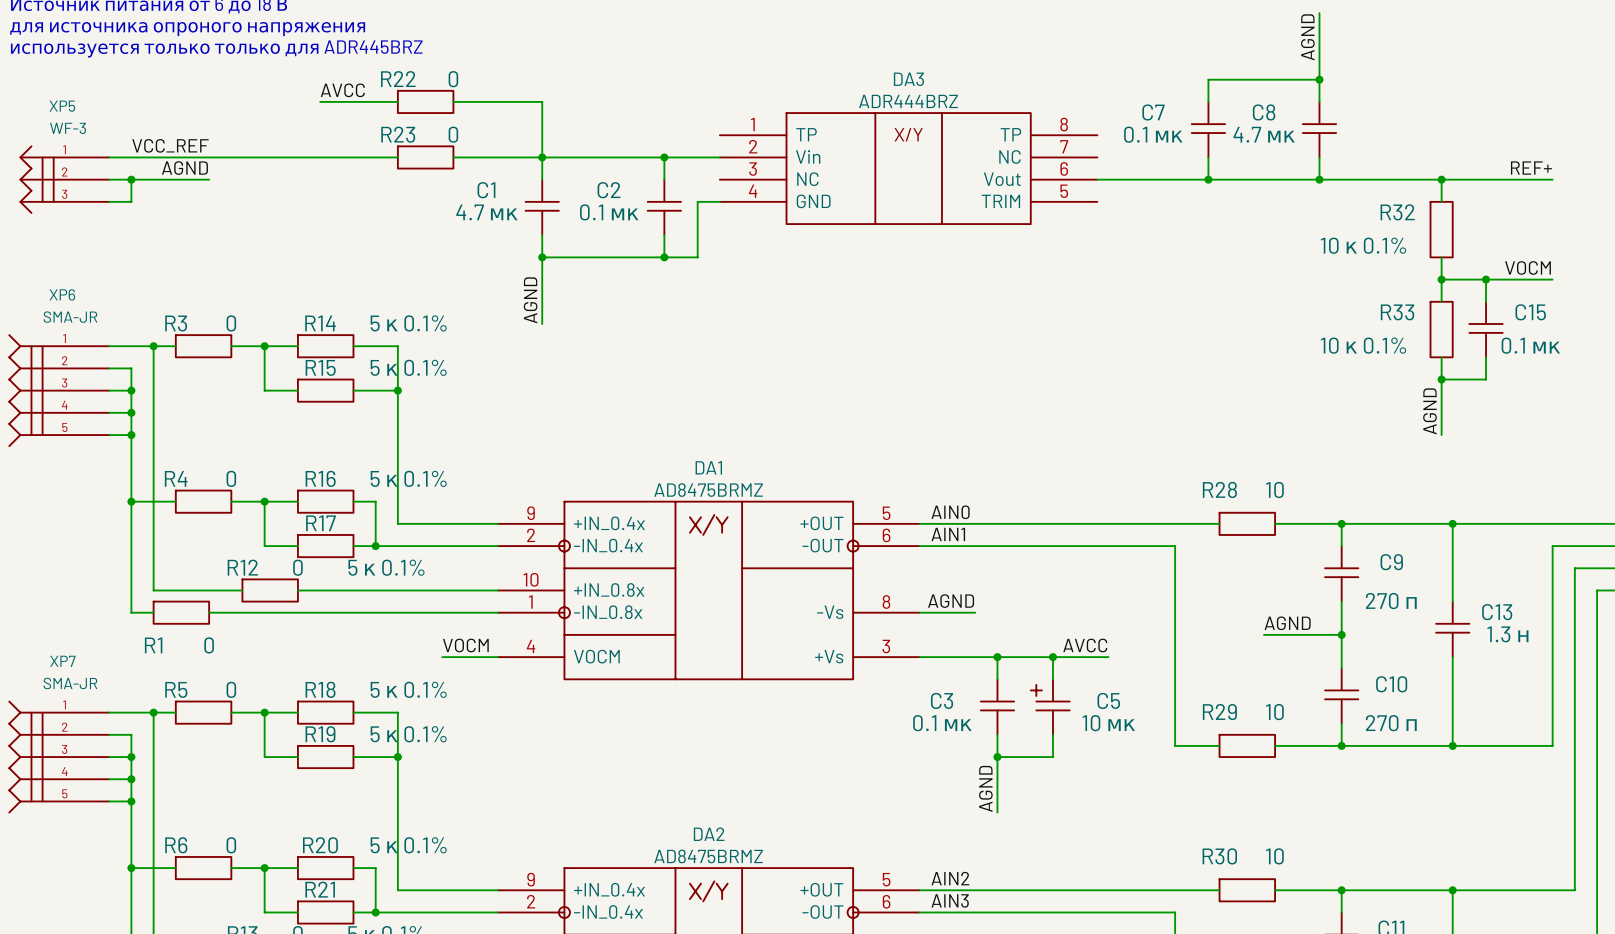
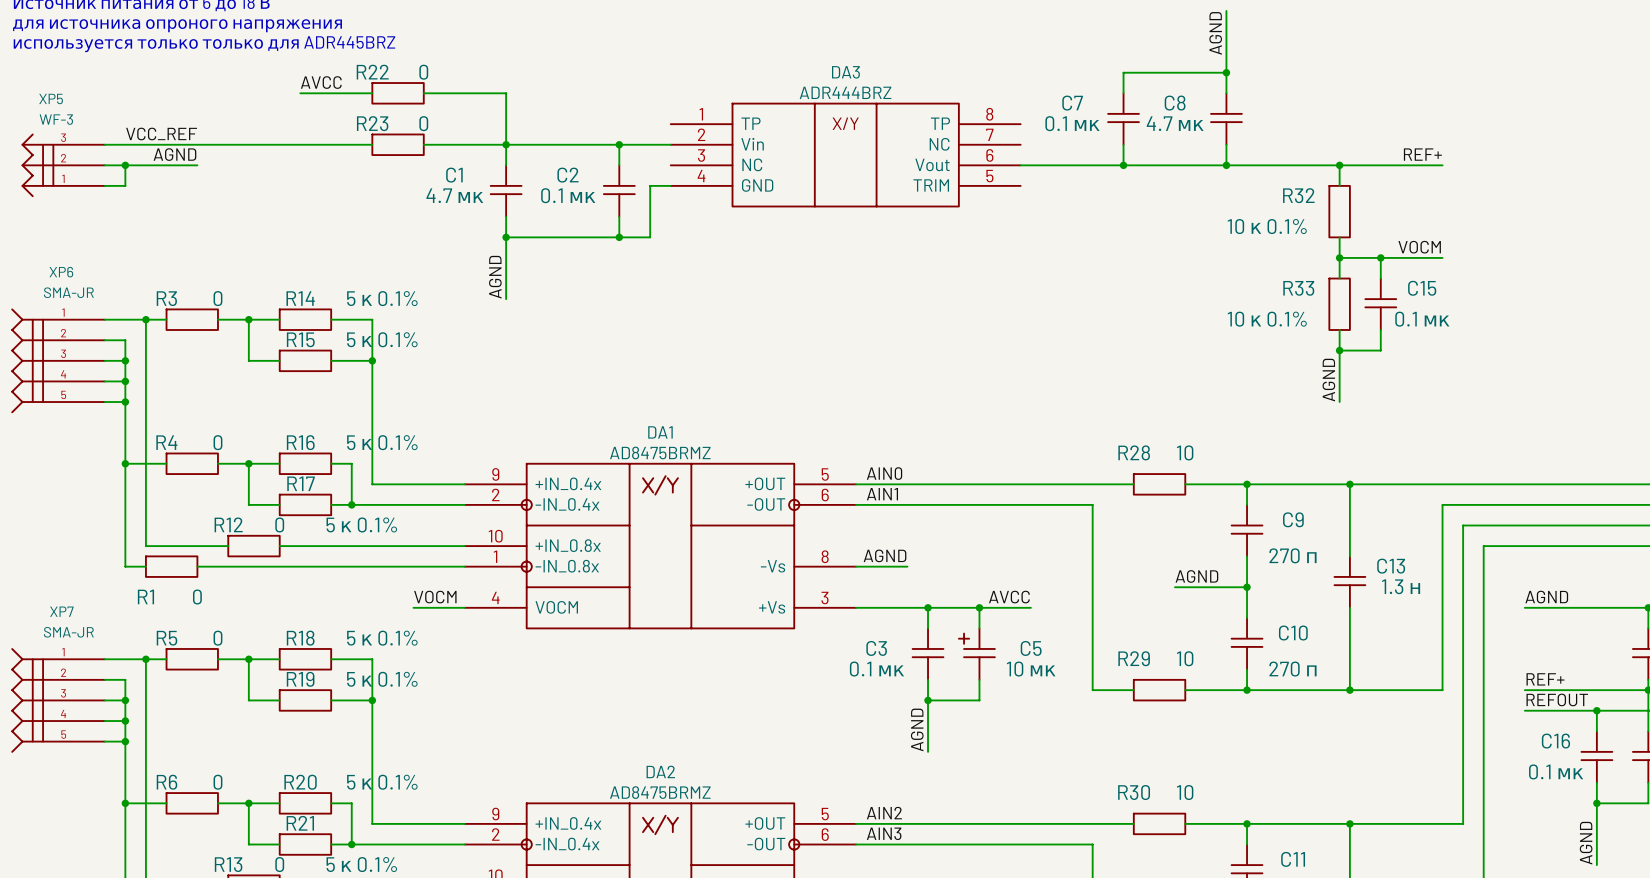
XP5 flip: as is (37, 179) -> up-down (37, 165)

